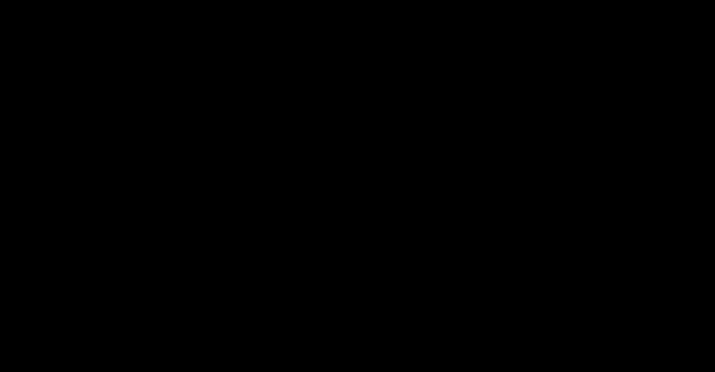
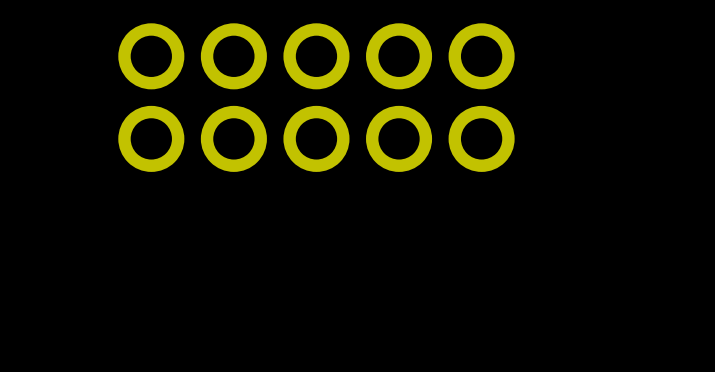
part: none -> (316, 97)

